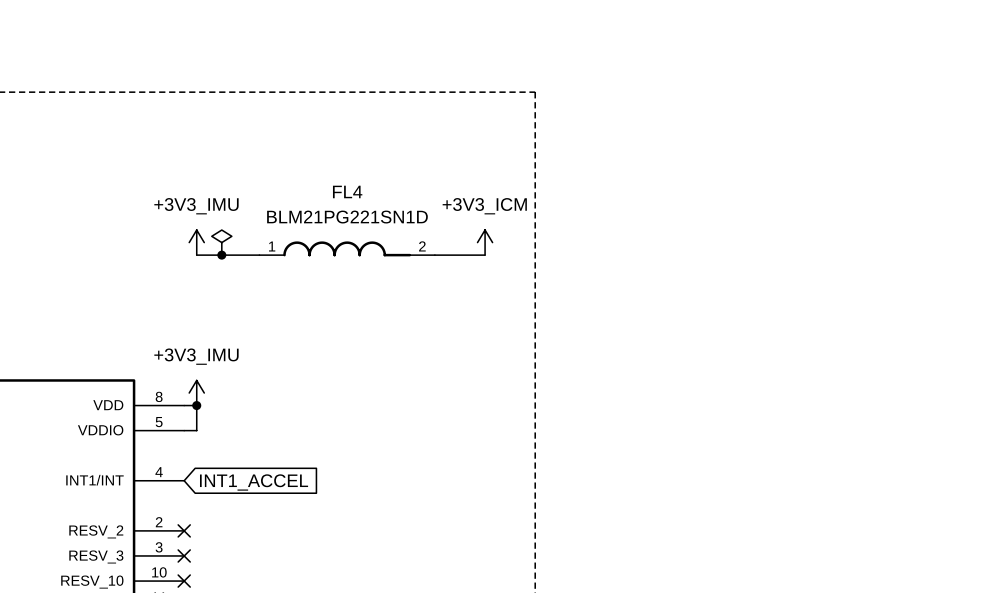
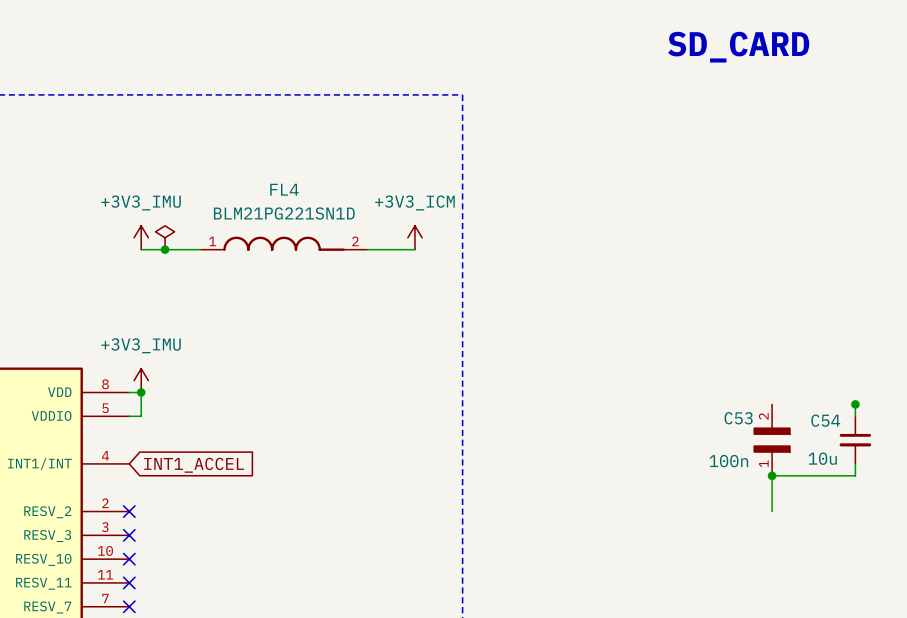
text: none -> SD_CARD (738, 47)
wire: none -> (855, 404) (855, 416)
junction: none -> (855, 404)
C53: none -> 100n (772, 440)
C54: none -> 10u (855, 440)
wire: none -> (855, 463) (855, 475) (772, 475) (772, 511)
junction: none -> (772, 475)

